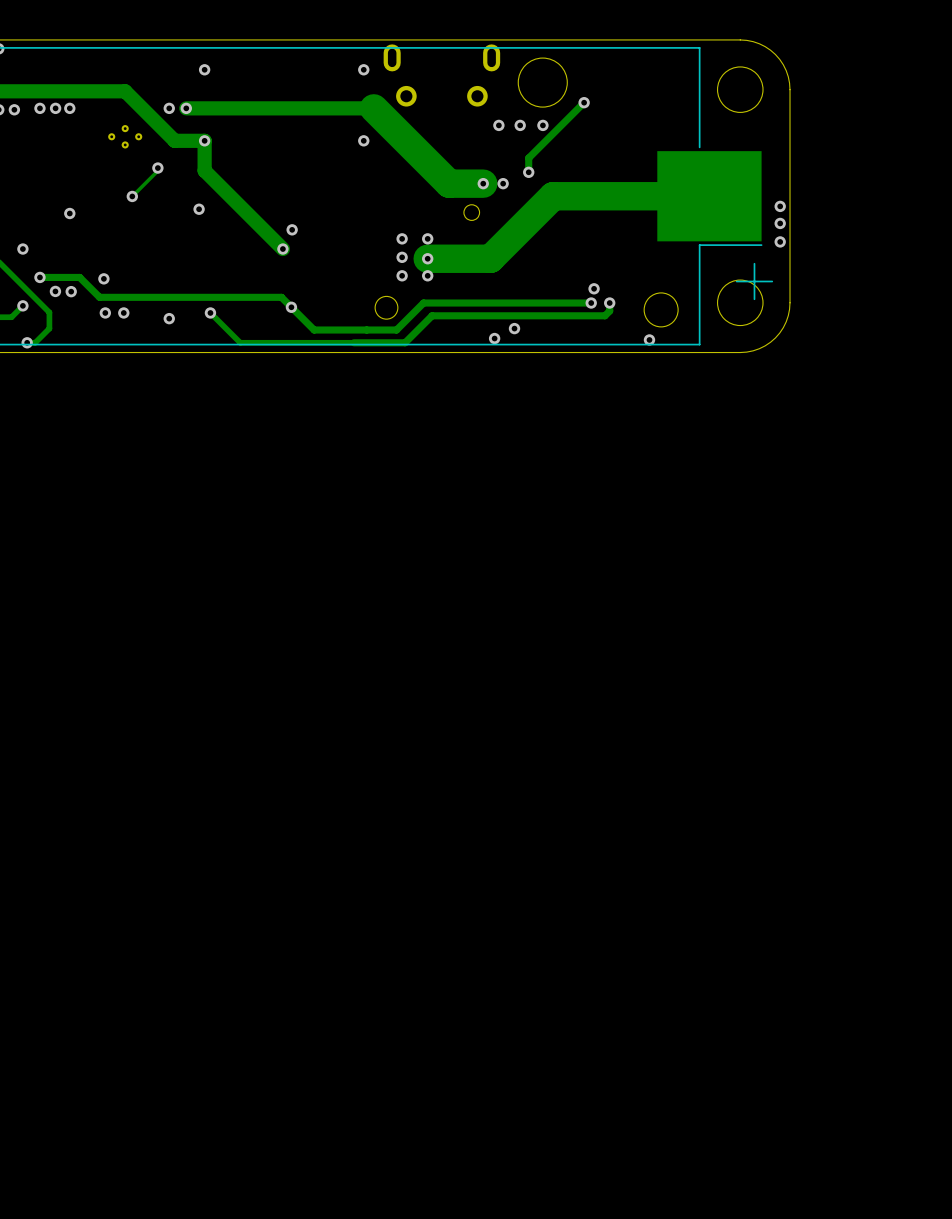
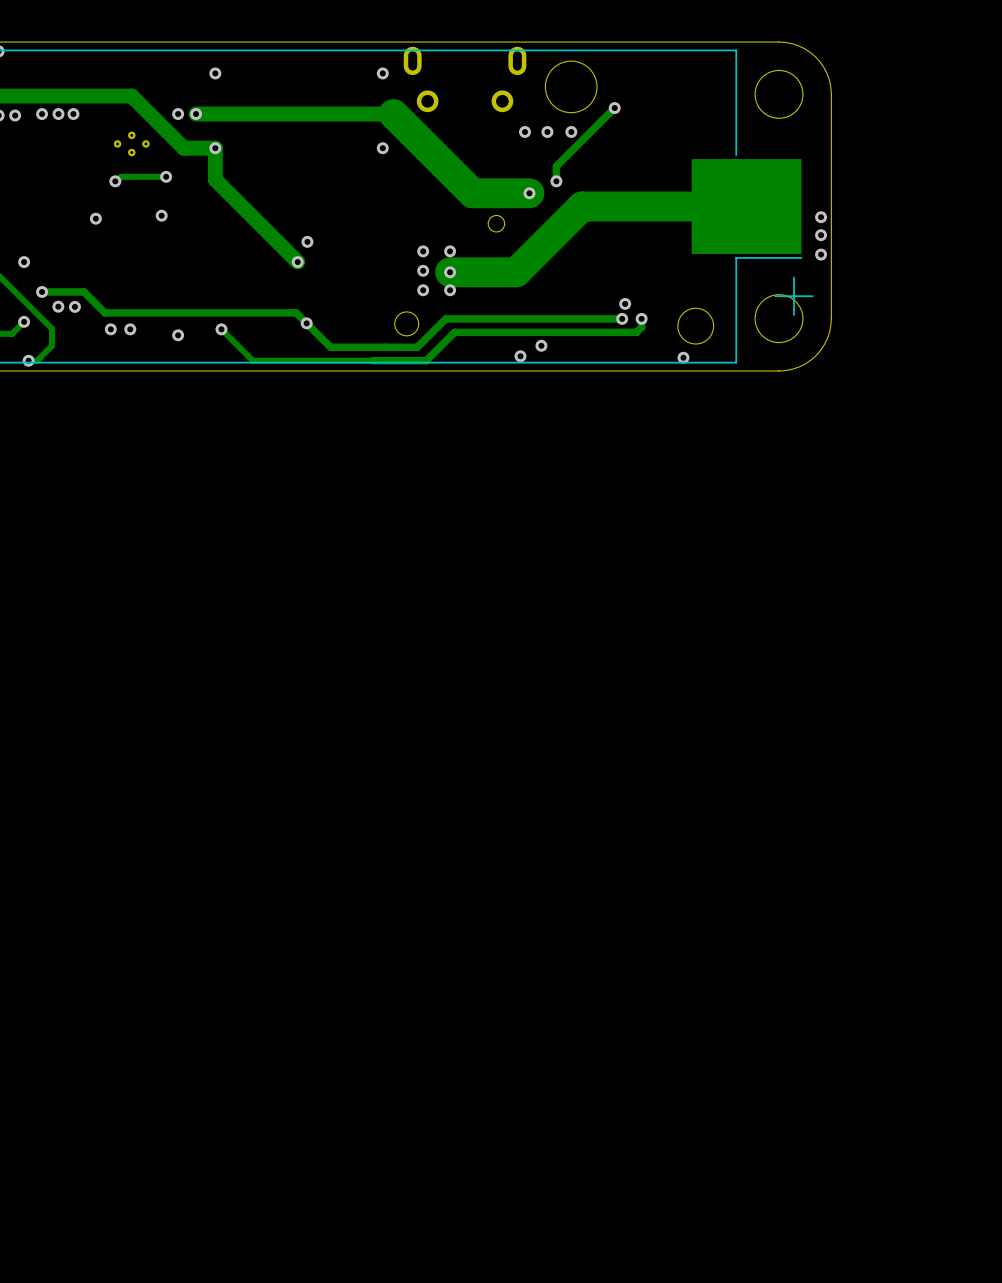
track: (157, 168) (157, 170) (132, 196) -> (166, 176) (121, 176) (115, 181)
via: none -> (115, 181)
via: (483, 183) -> none
track: none -> (529, 193) (508, 193)
via: (132, 196) -> none
via: none -> (161, 215)
via: none -> (95, 218)
via: (199, 209) -> none
via: (69, 213) -> none
via: (103, 278) -> none

